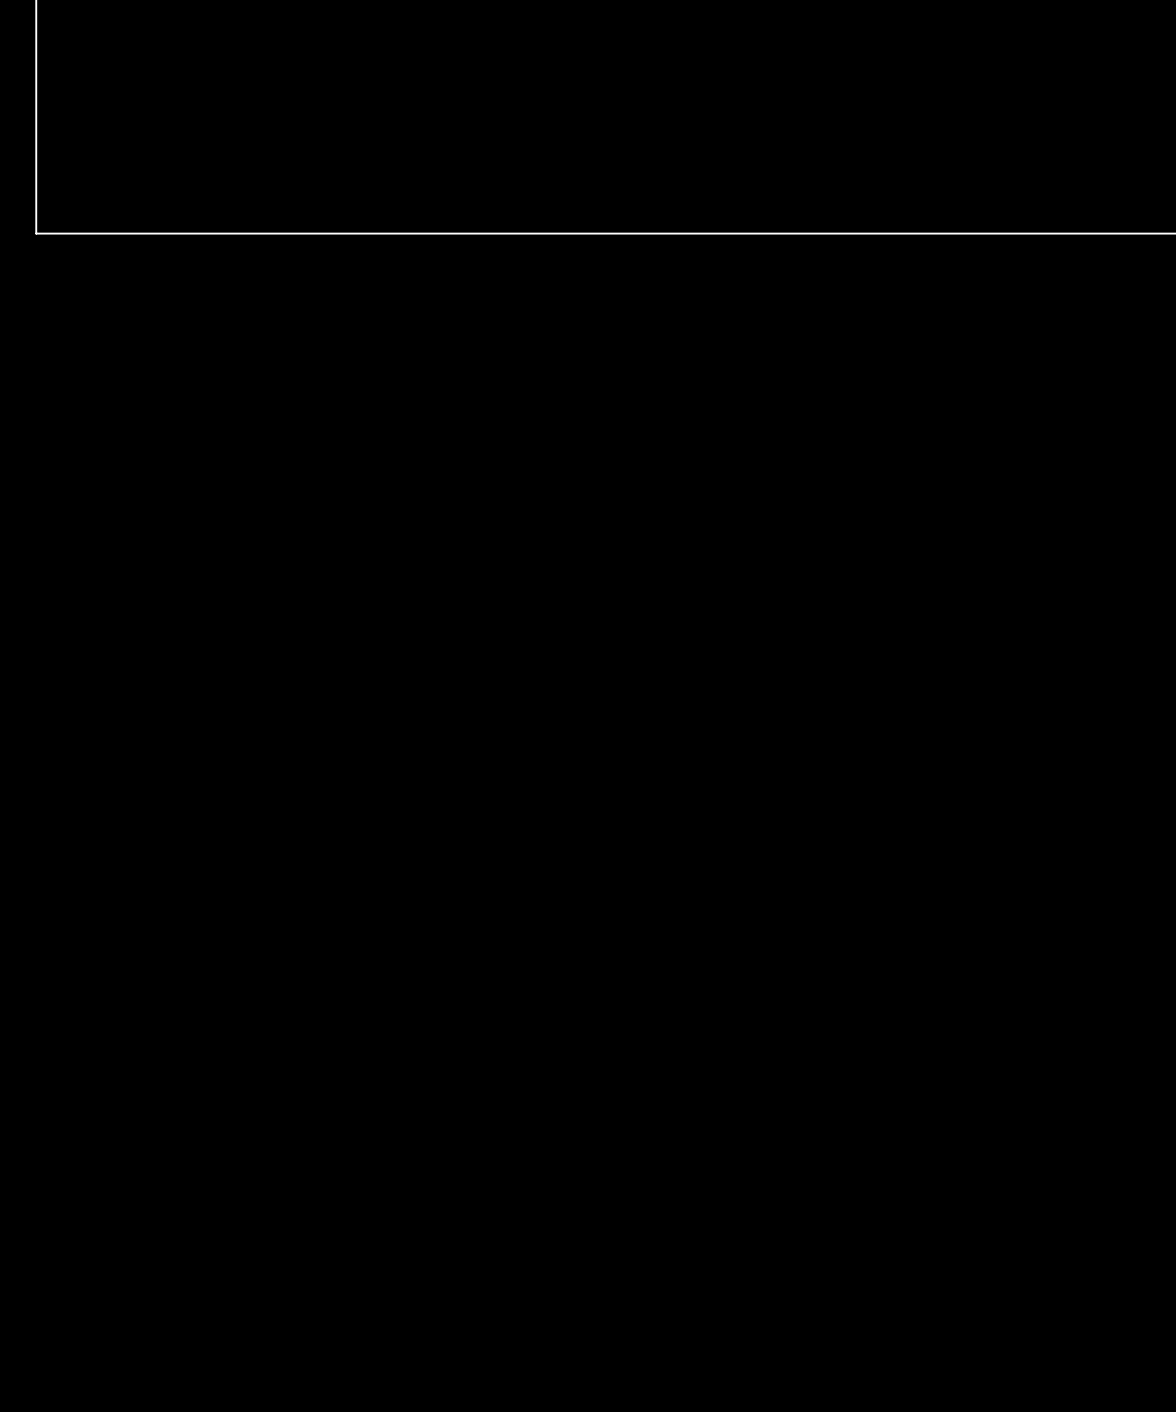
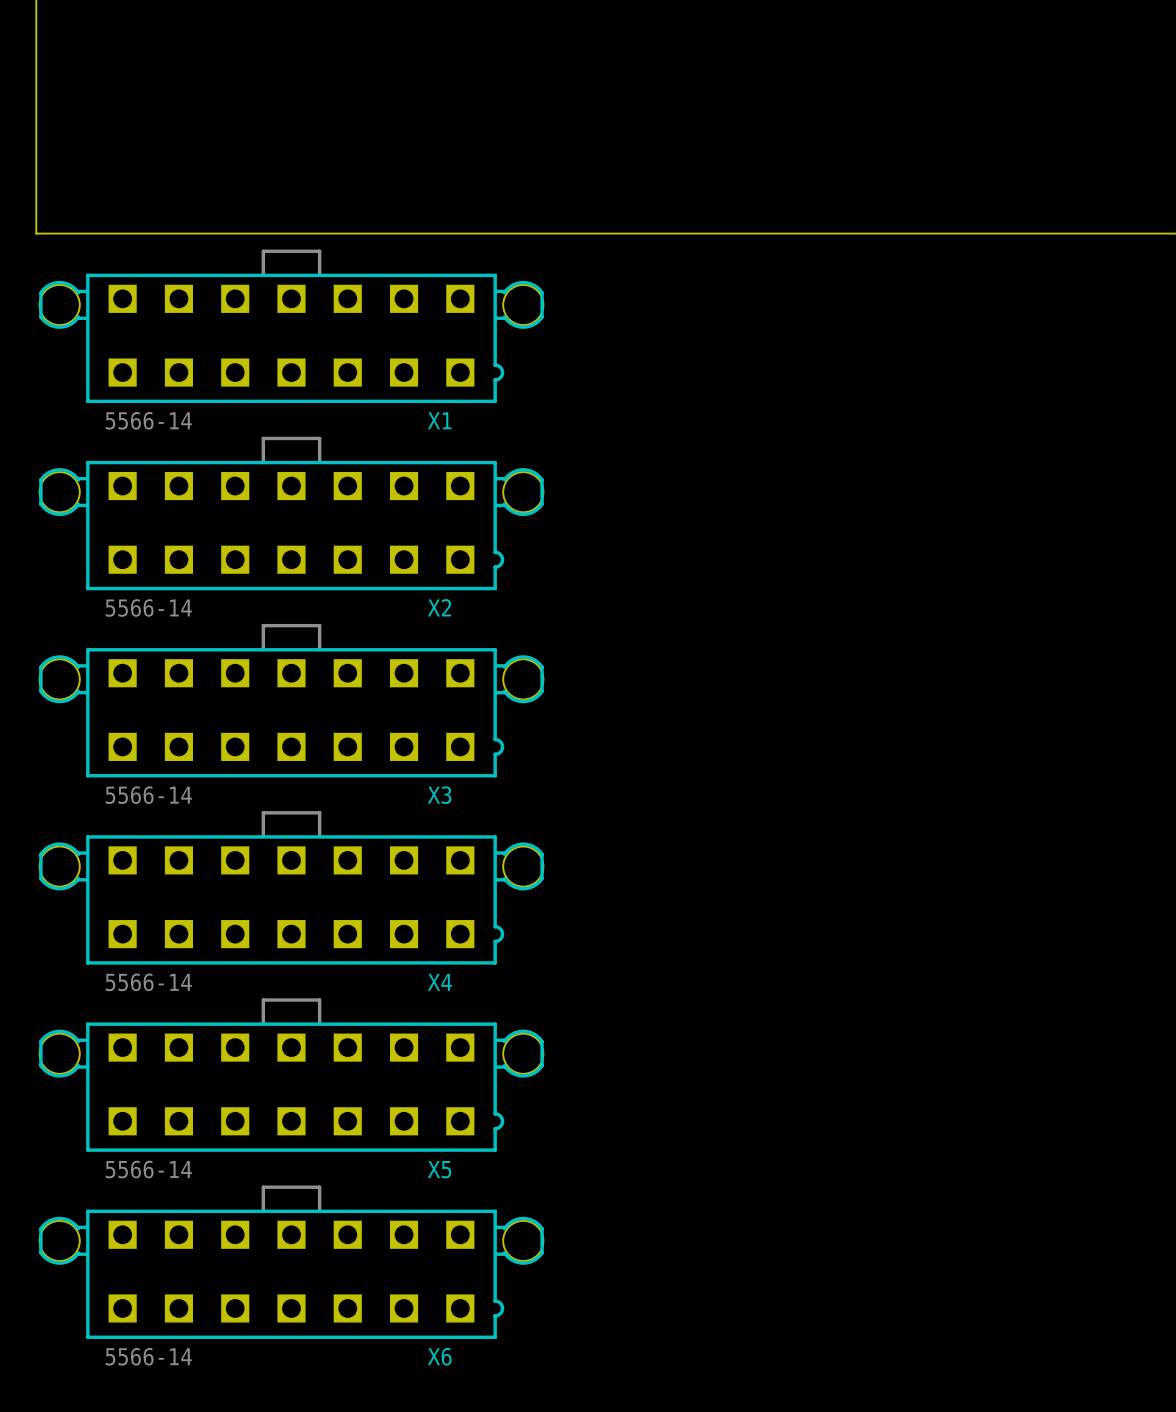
X1: none -> 5566-14 (291, 326)
X2: none -> 5566-14 (291, 513)
X3: none -> 5566-14 (291, 700)
X4: none -> 5566-14 (291, 887)
X5: none -> 5566-14 (291, 1075)
X6: none -> 5566-14 (291, 1262)

